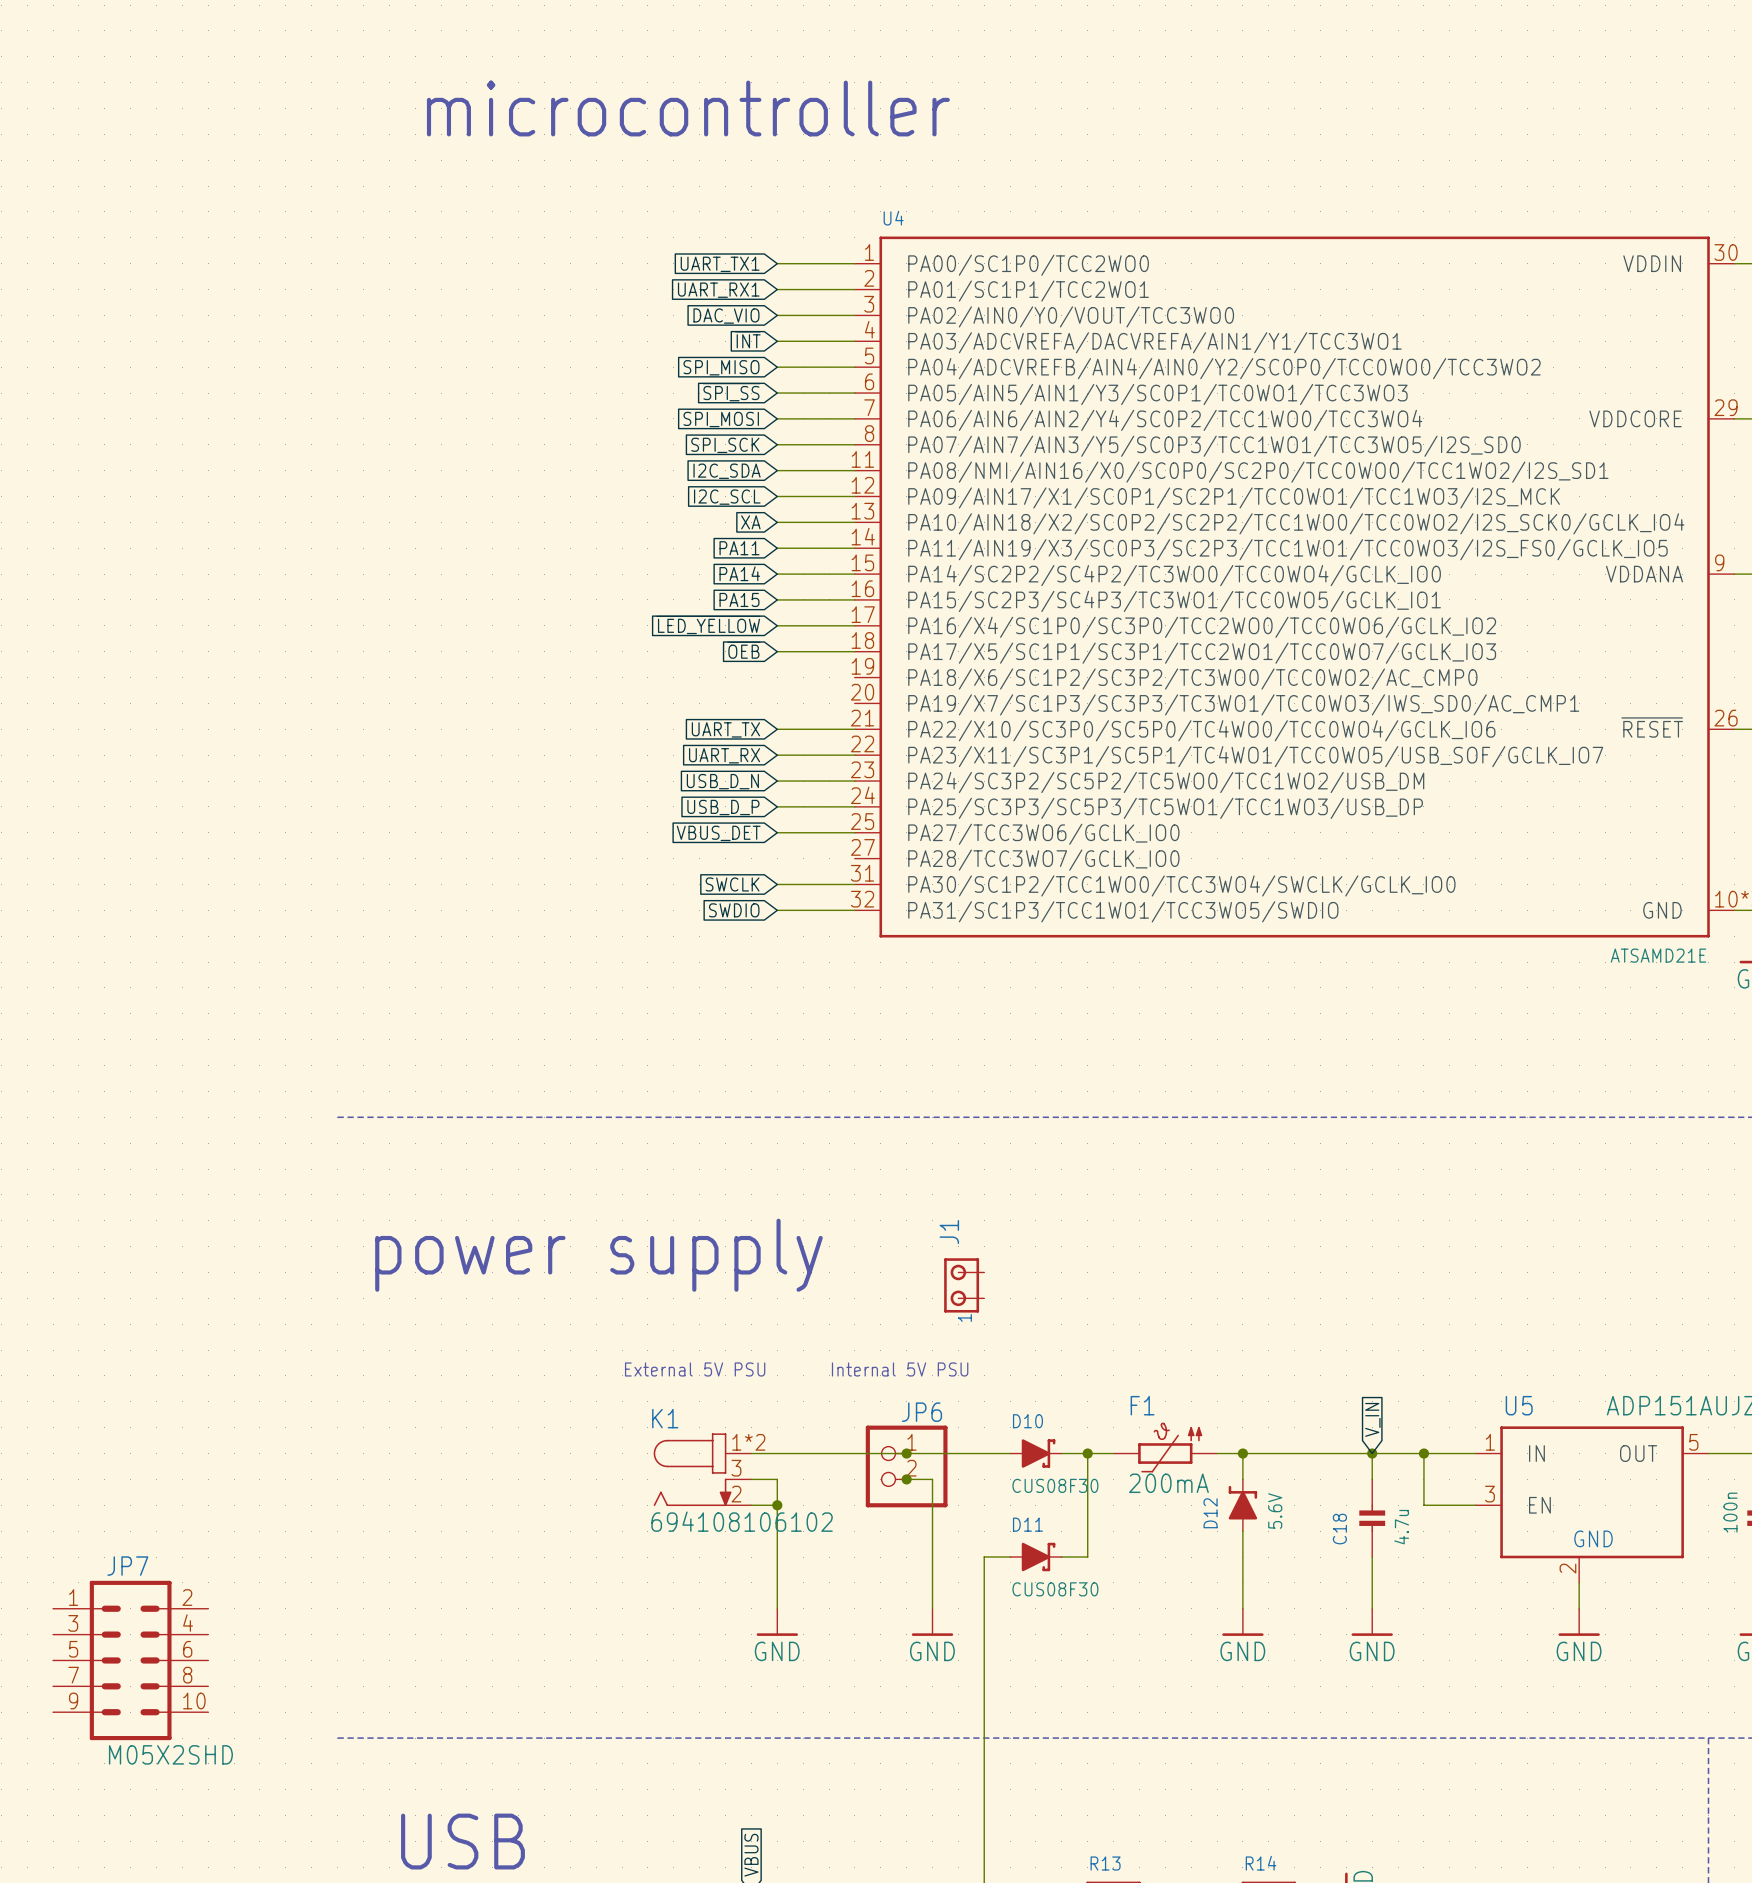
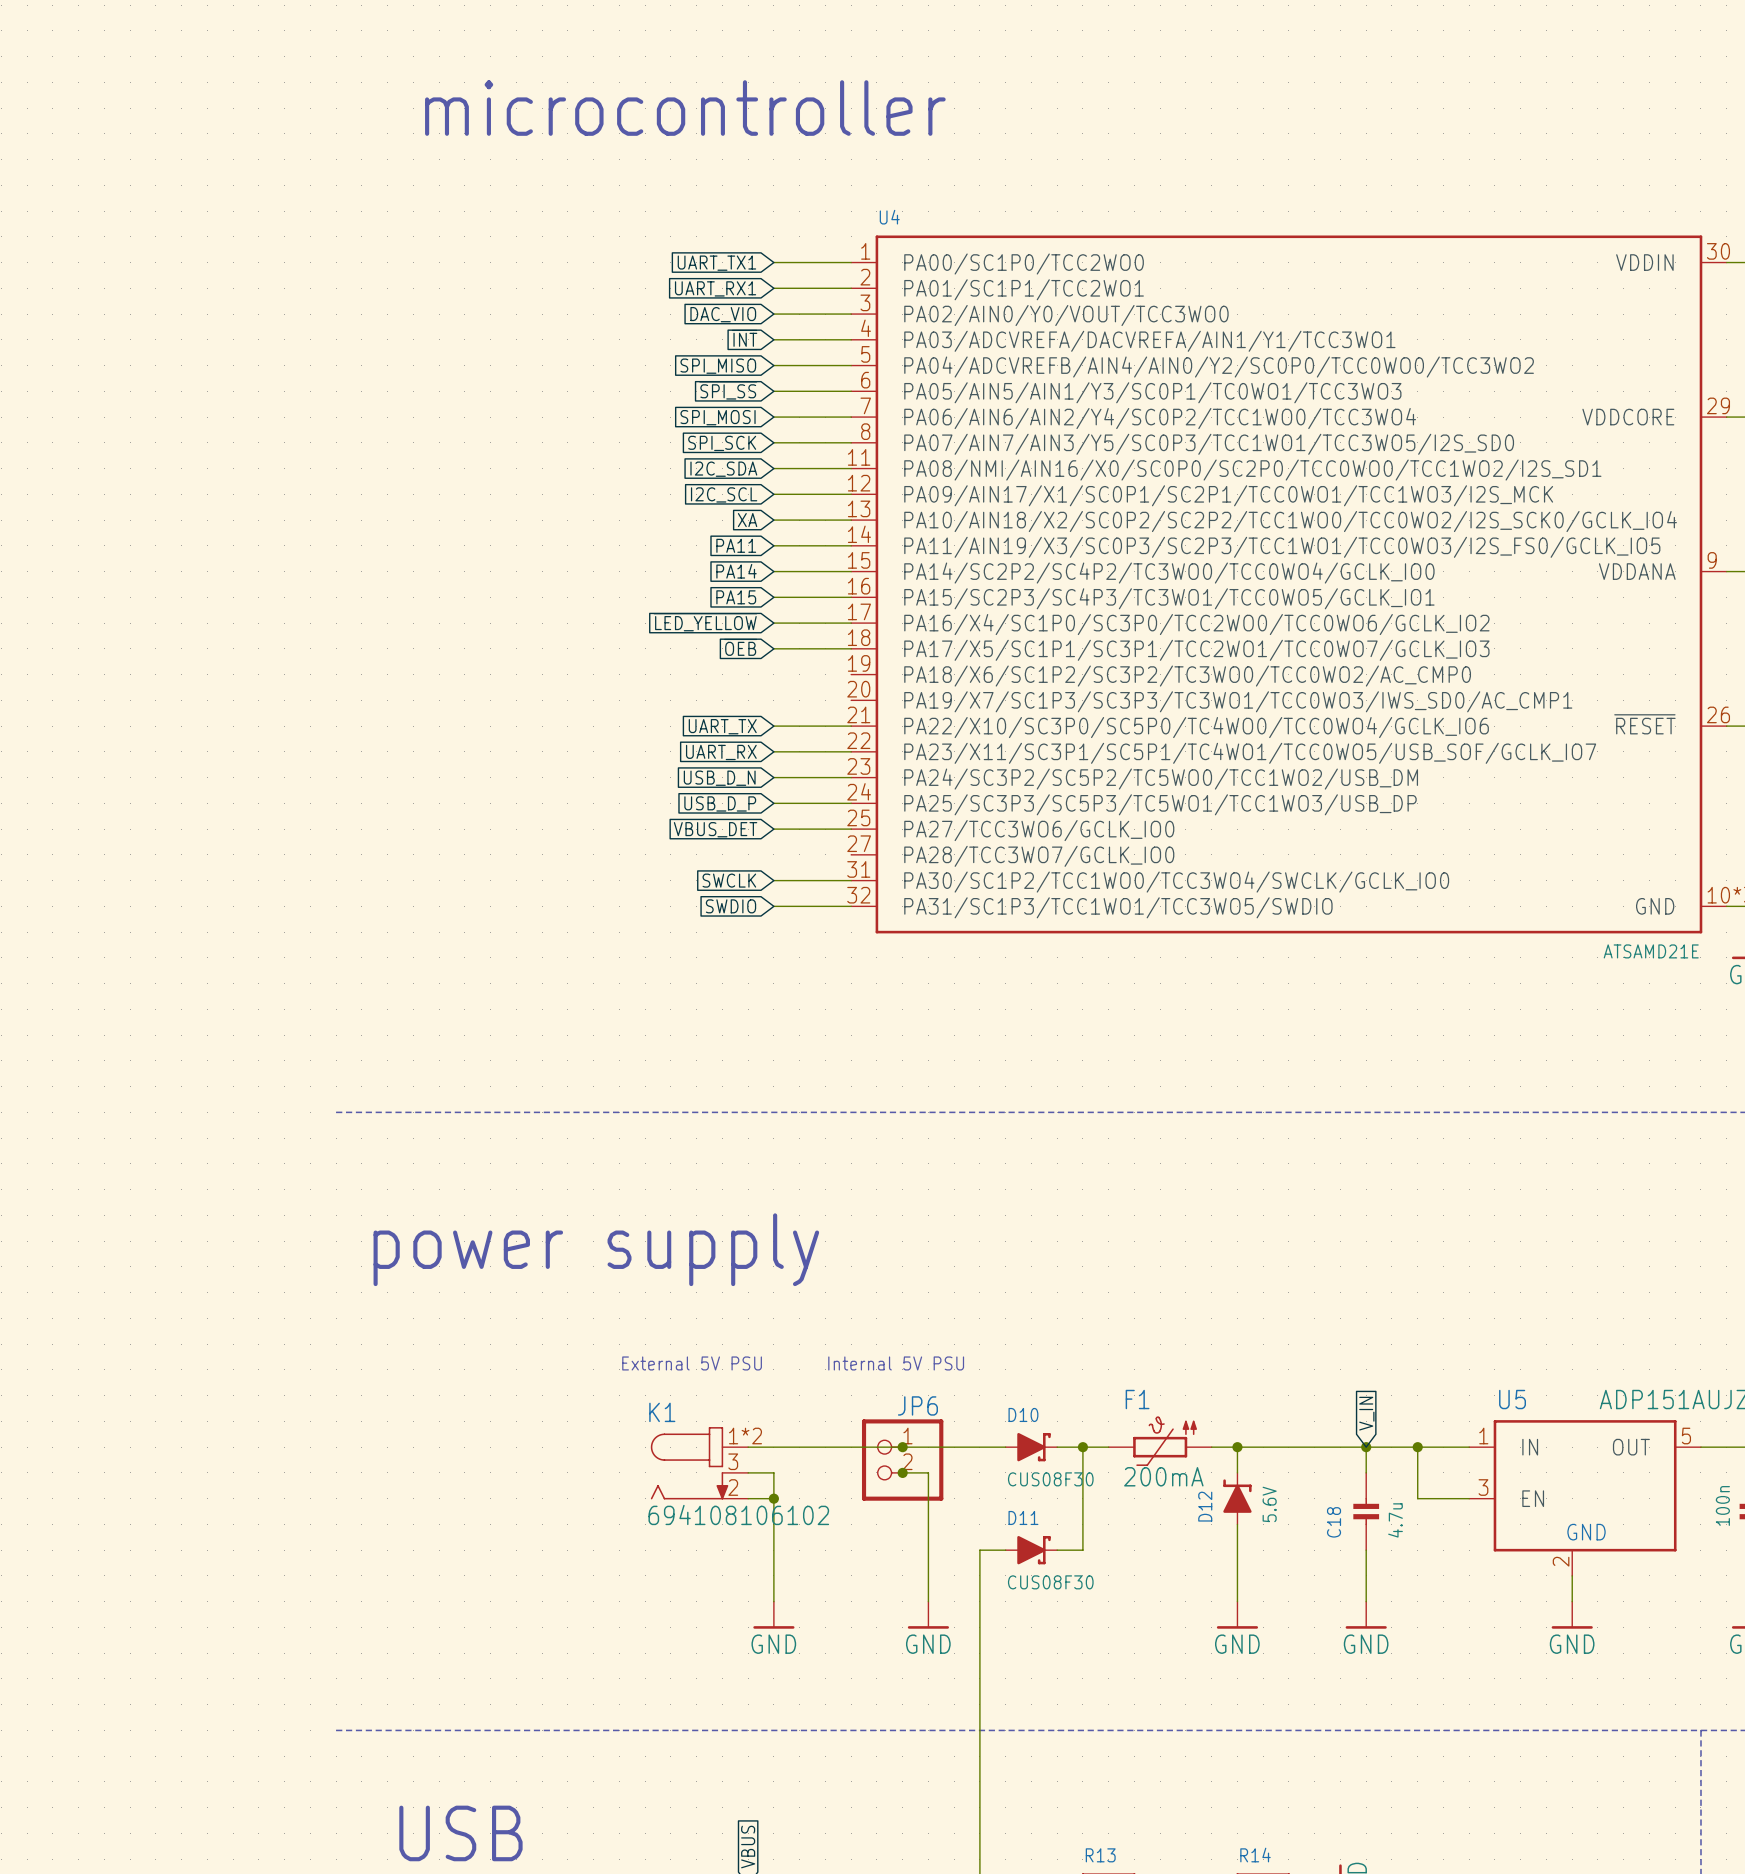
J1: (964, 1285) -> none
JP7: M05X2SHD (130, 1660) -> none

